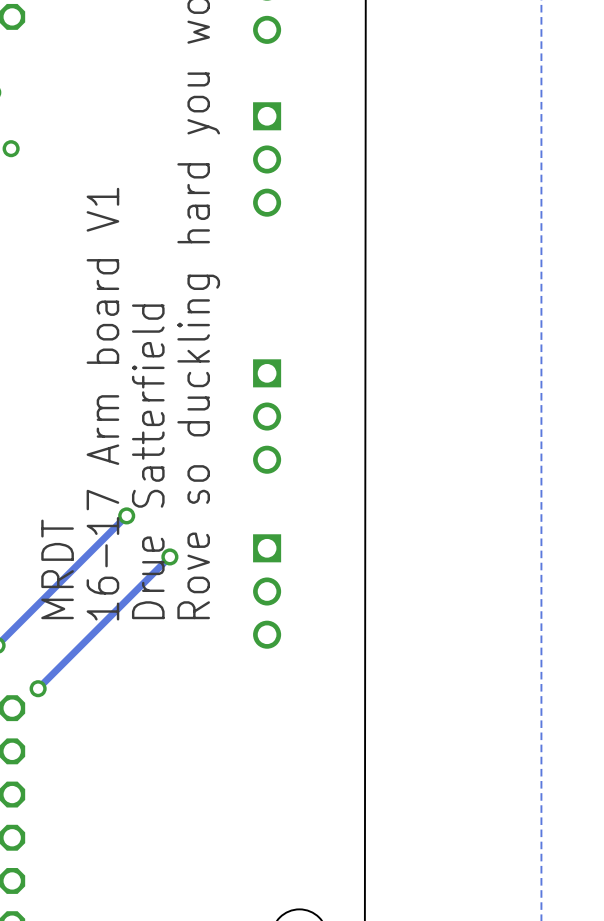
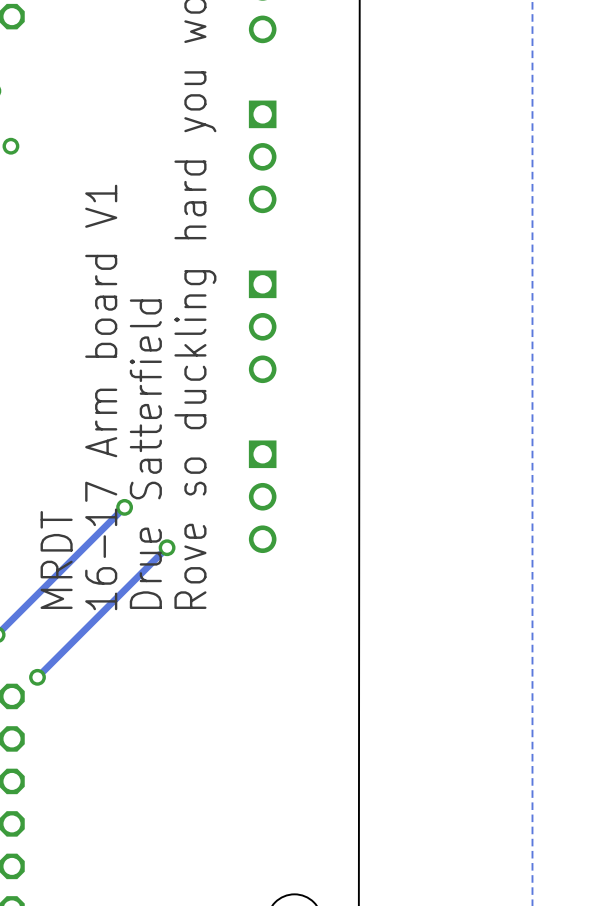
part: none -> (262, 326)
part: (267, 416) -> none
part: none -> (262, 496)
part: (267, 591) -> none

